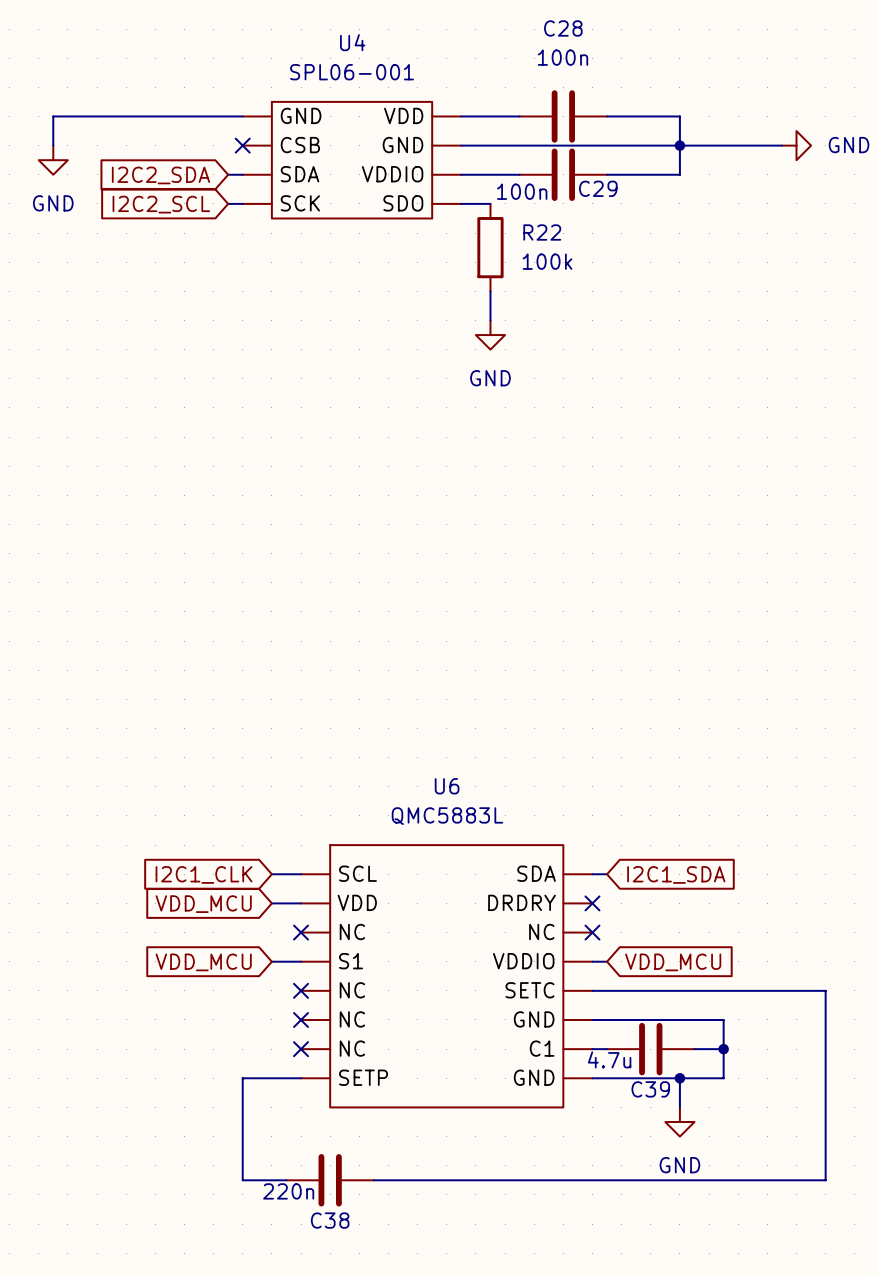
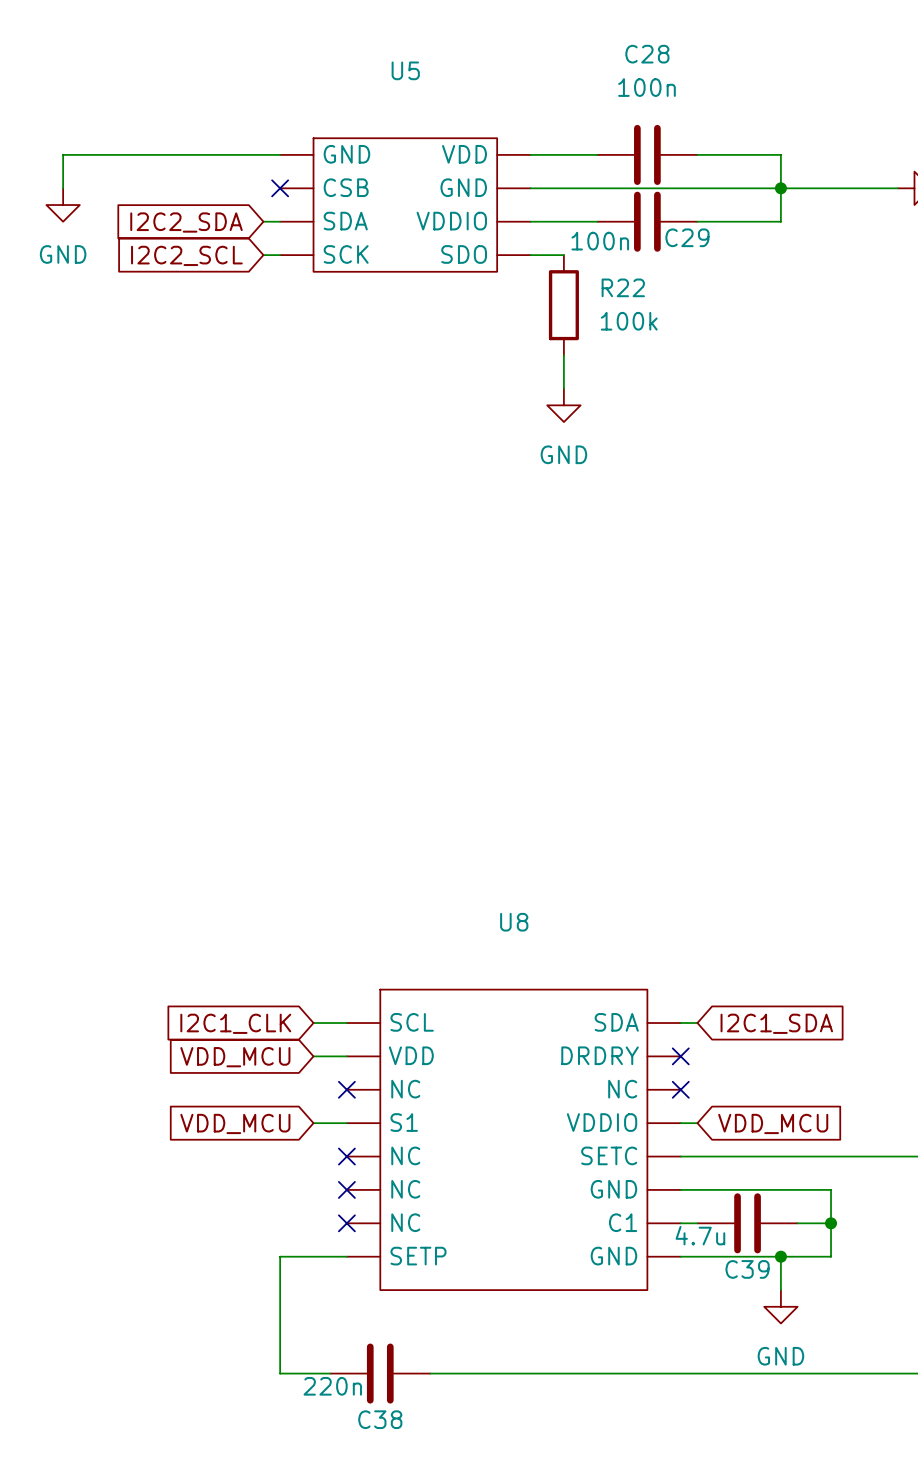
U4 name: U4 (352, 42) -> U5 (405, 70)
U4 value: SPL06-001 (352, 72) -> none
U6 name: U6 (447, 786) -> U8 (514, 922)
U6 value: QMC5883L (447, 816) -> none

